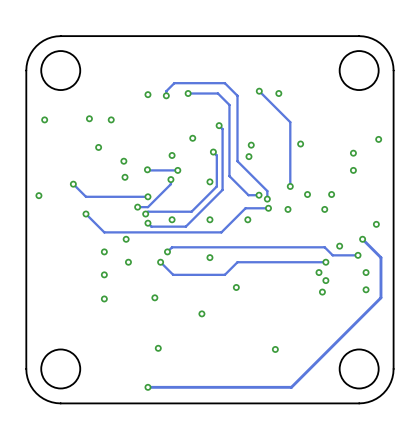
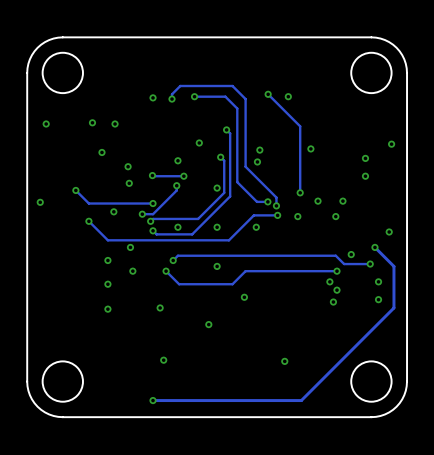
via: none -> (113, 211)

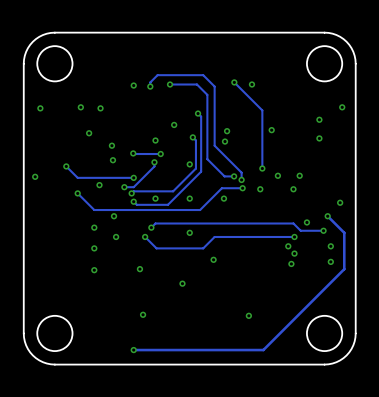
via: none -> (342, 107)
via: none -> (319, 119)
via: (391, 144) -> none
via: (365, 176) -> none

